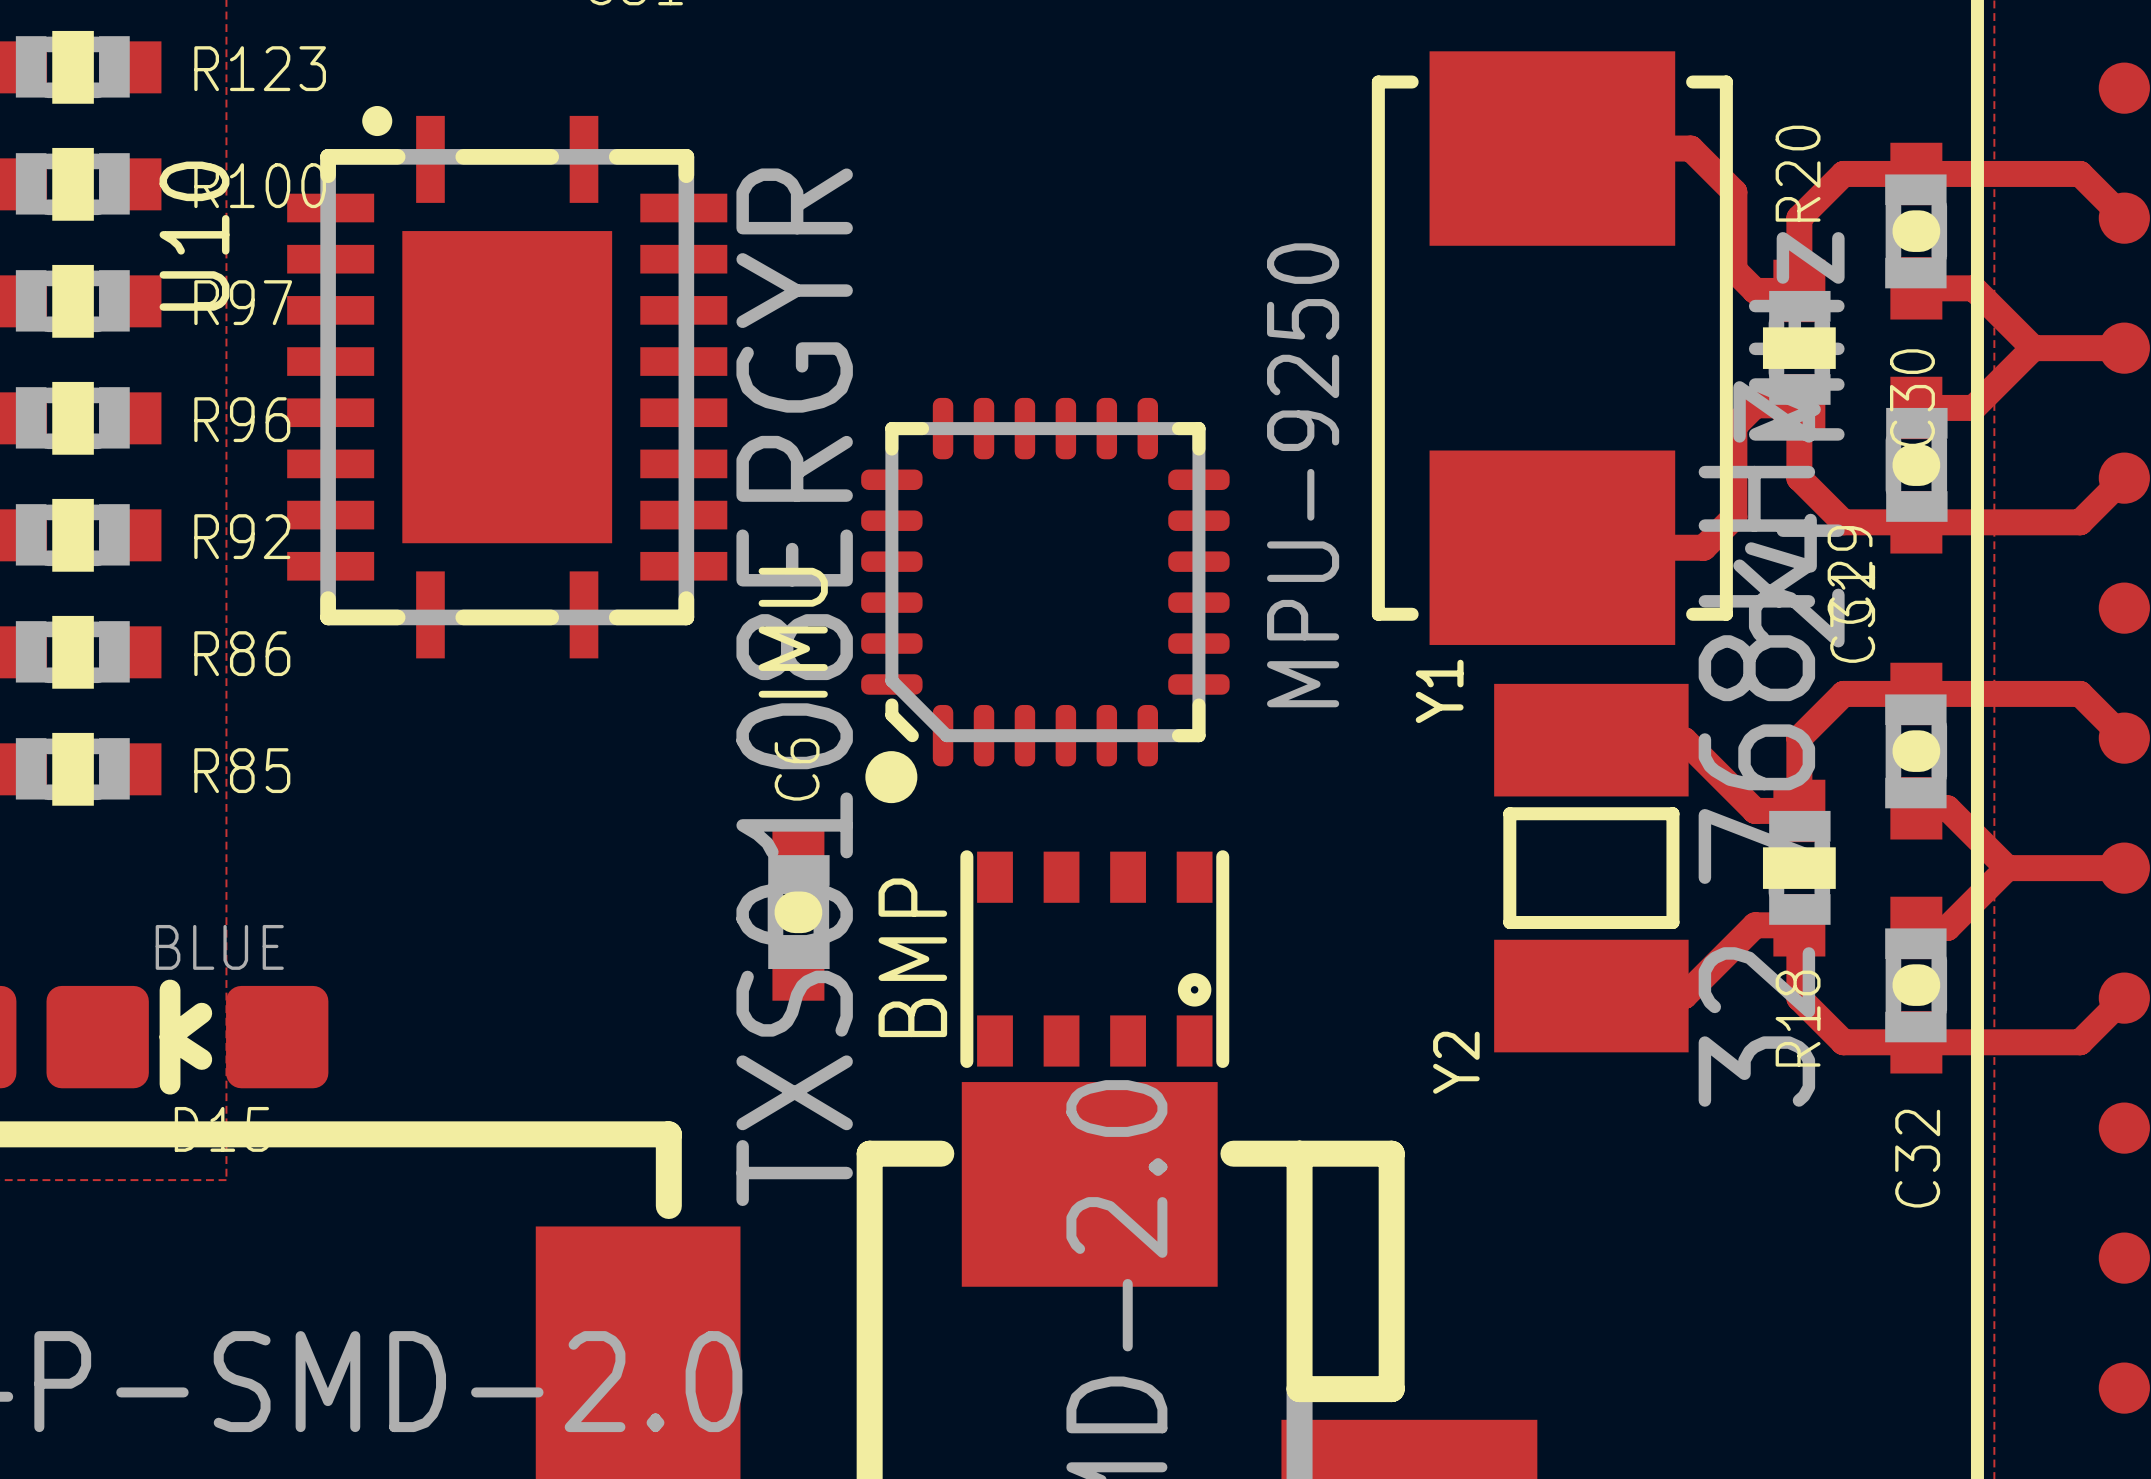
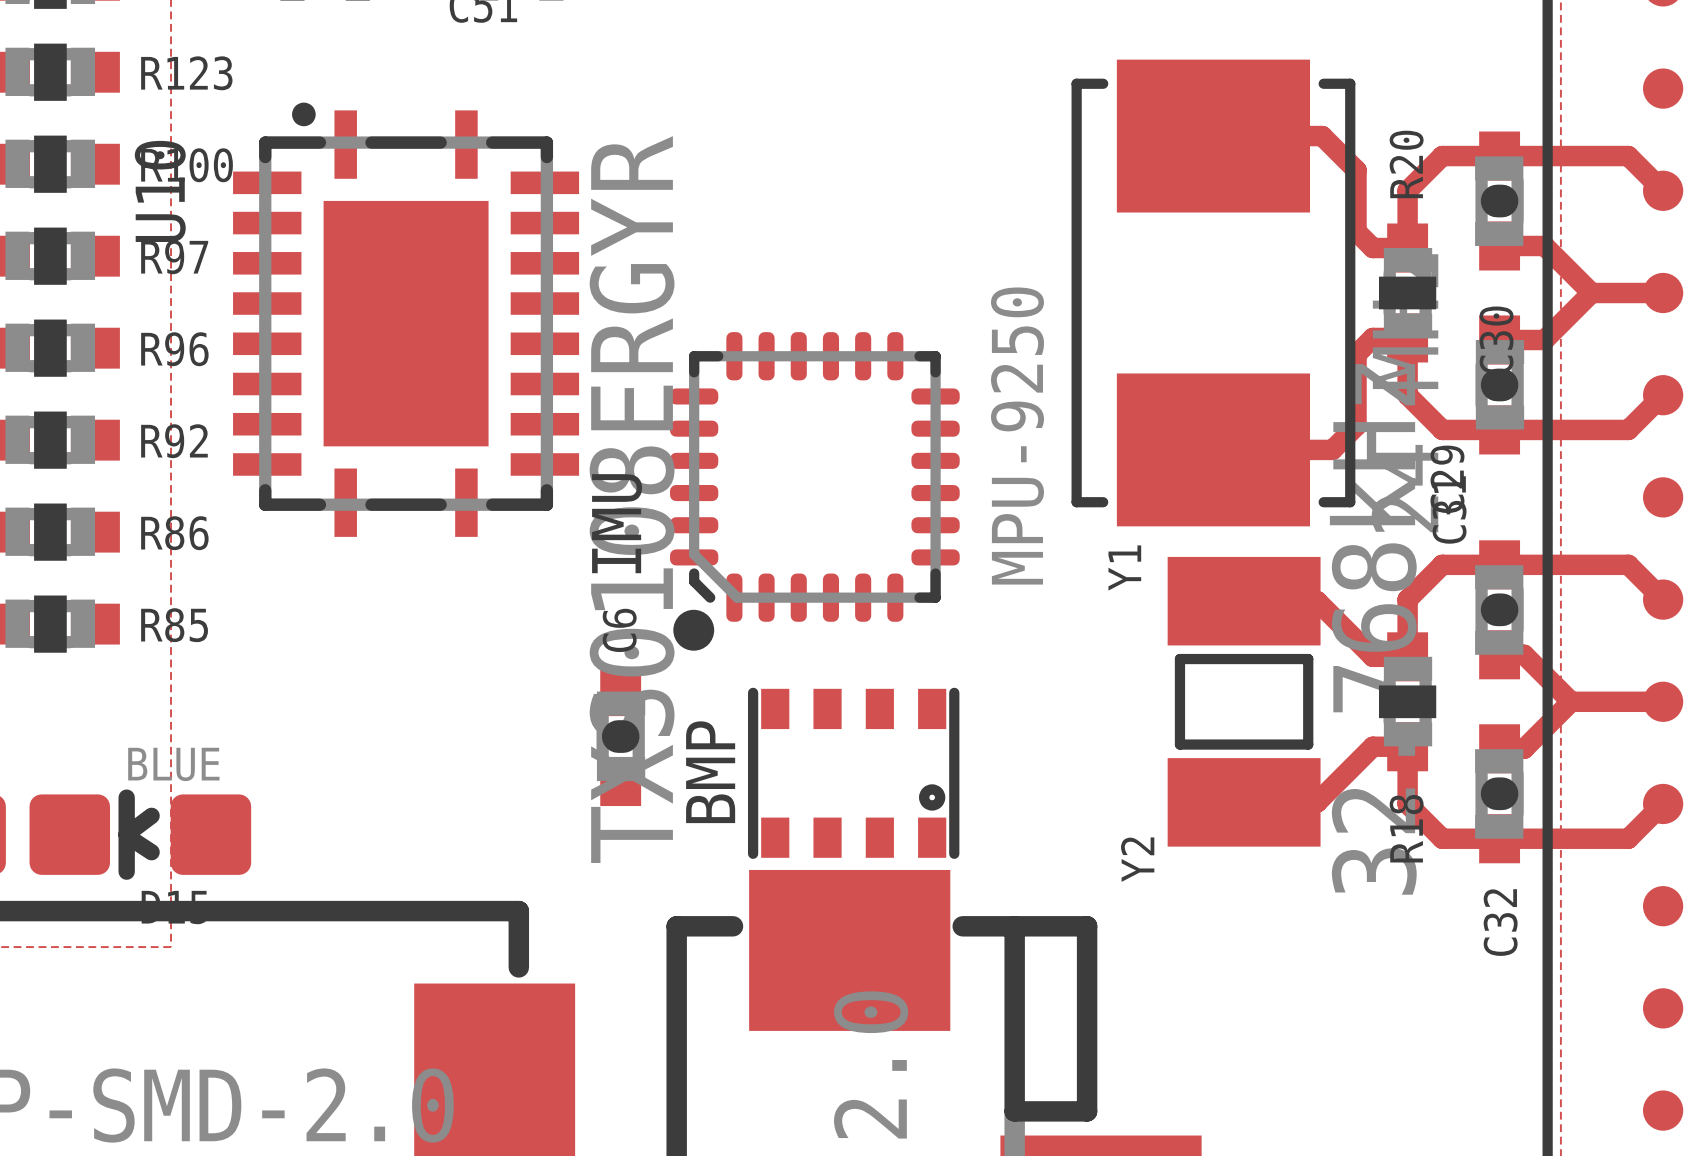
U10 position: (507, 382) -> (406, 319)

